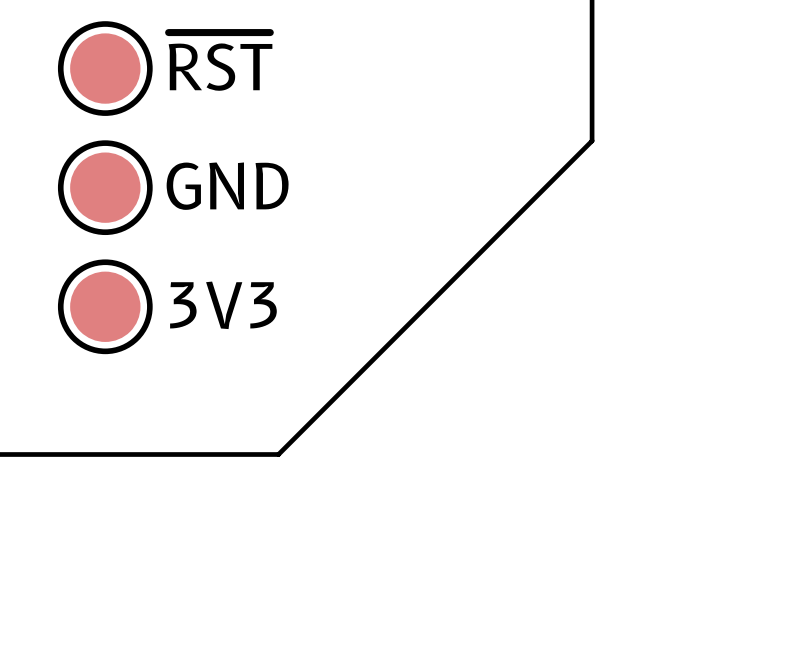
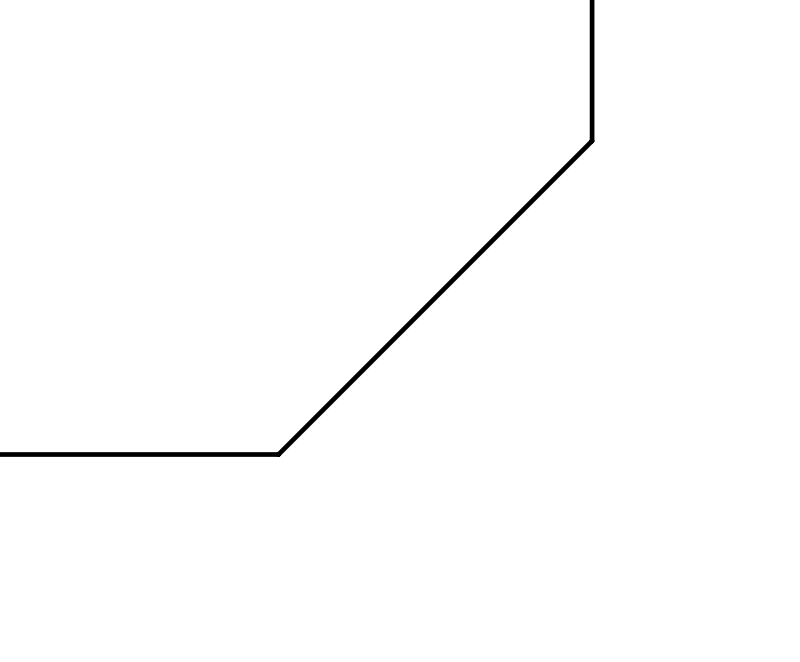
part: ~{RST} (105, 68) -> none
part: GND (105, 187) -> none
part: 3V3 (105, 306) -> none

